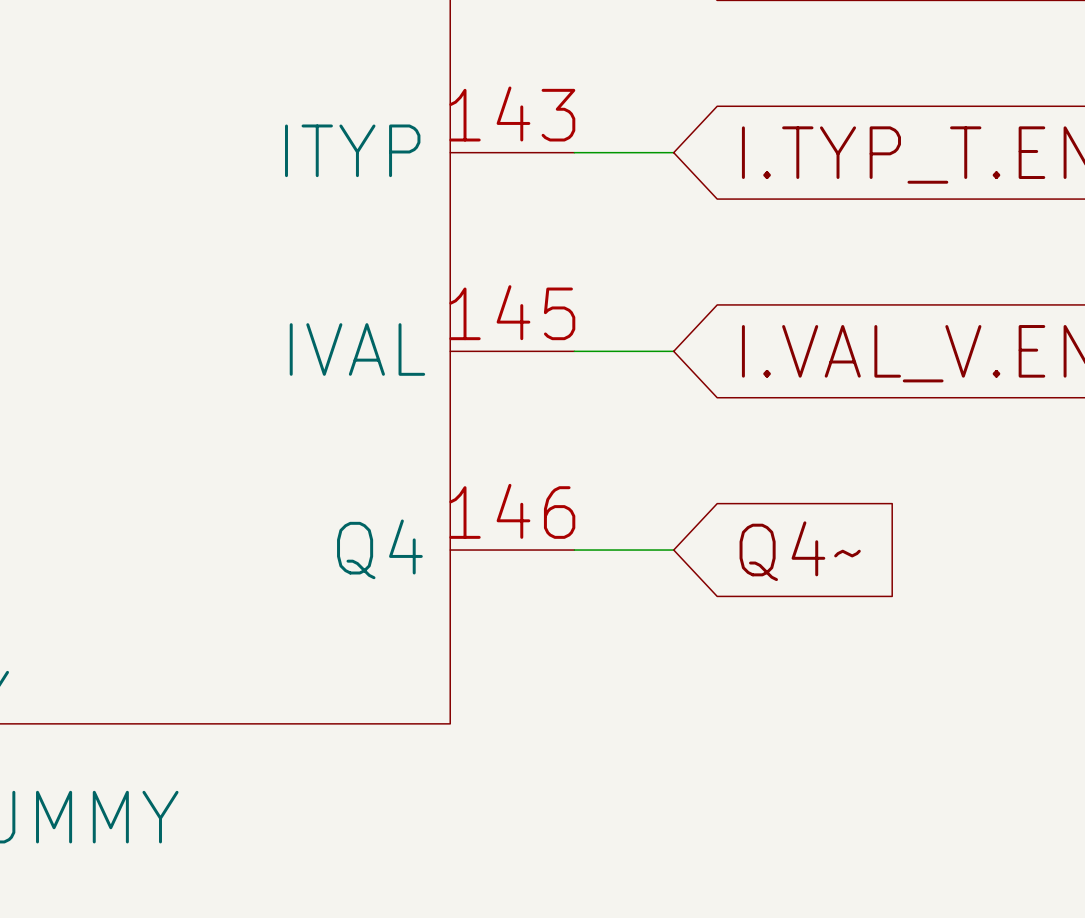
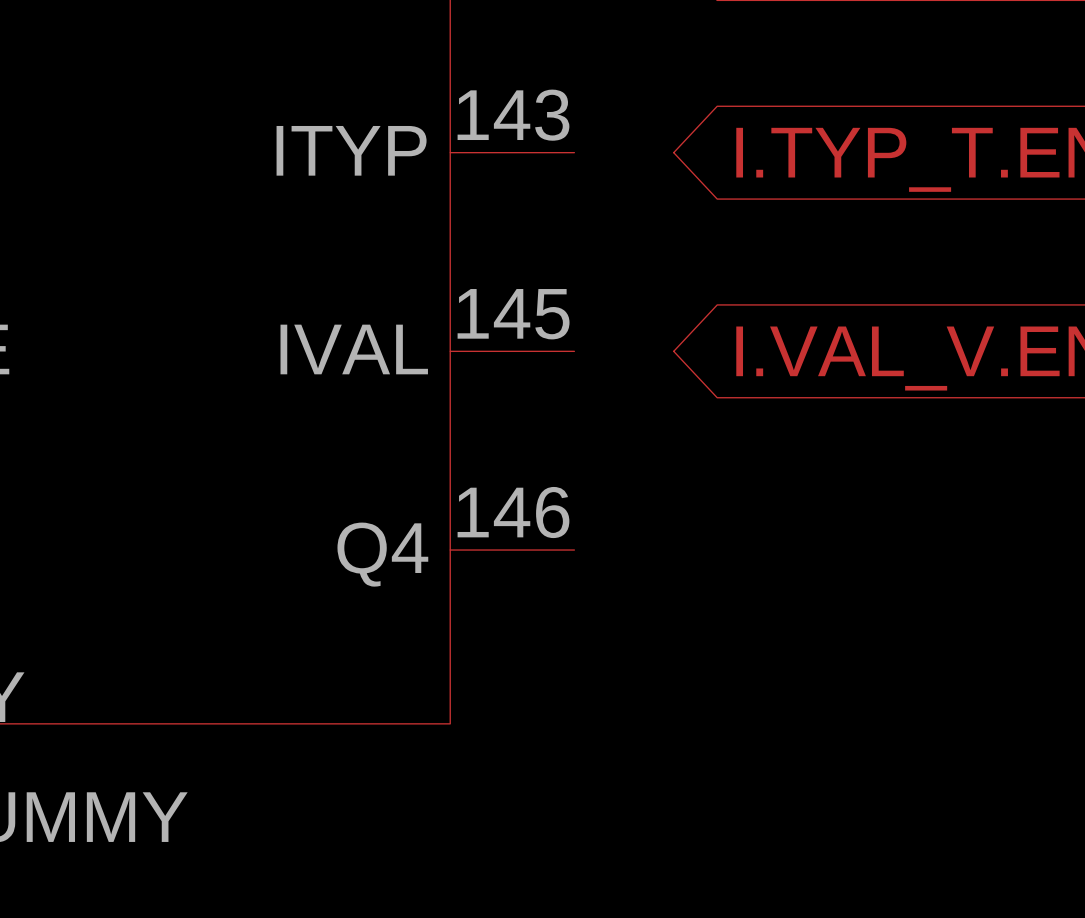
wire: (574, 152) (673, 152) -> none
wire: (574, 351) (673, 351) -> none
wire: (574, 550) (673, 550) -> none
global label: Q4~ (800, 551) -> none

